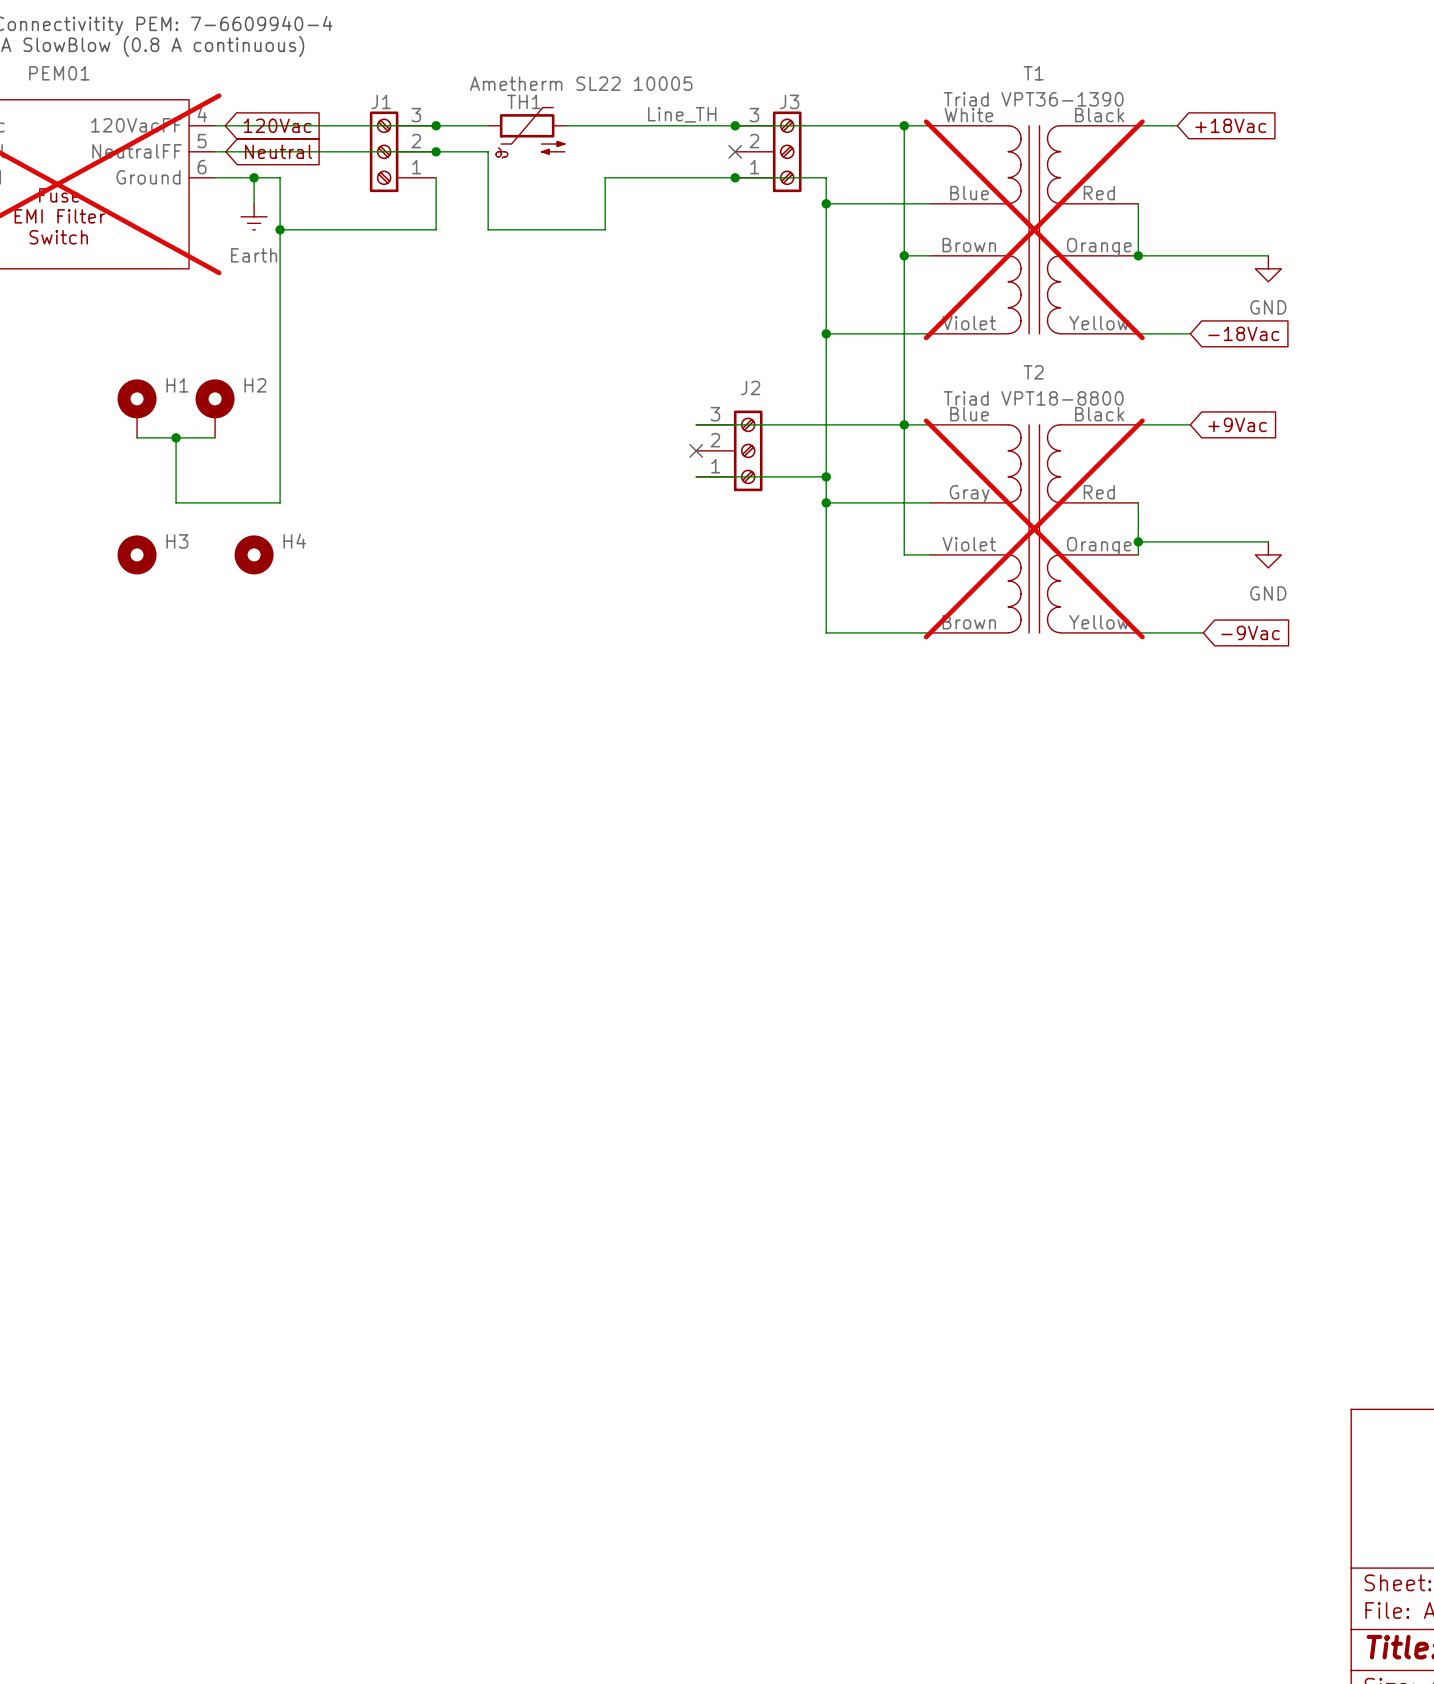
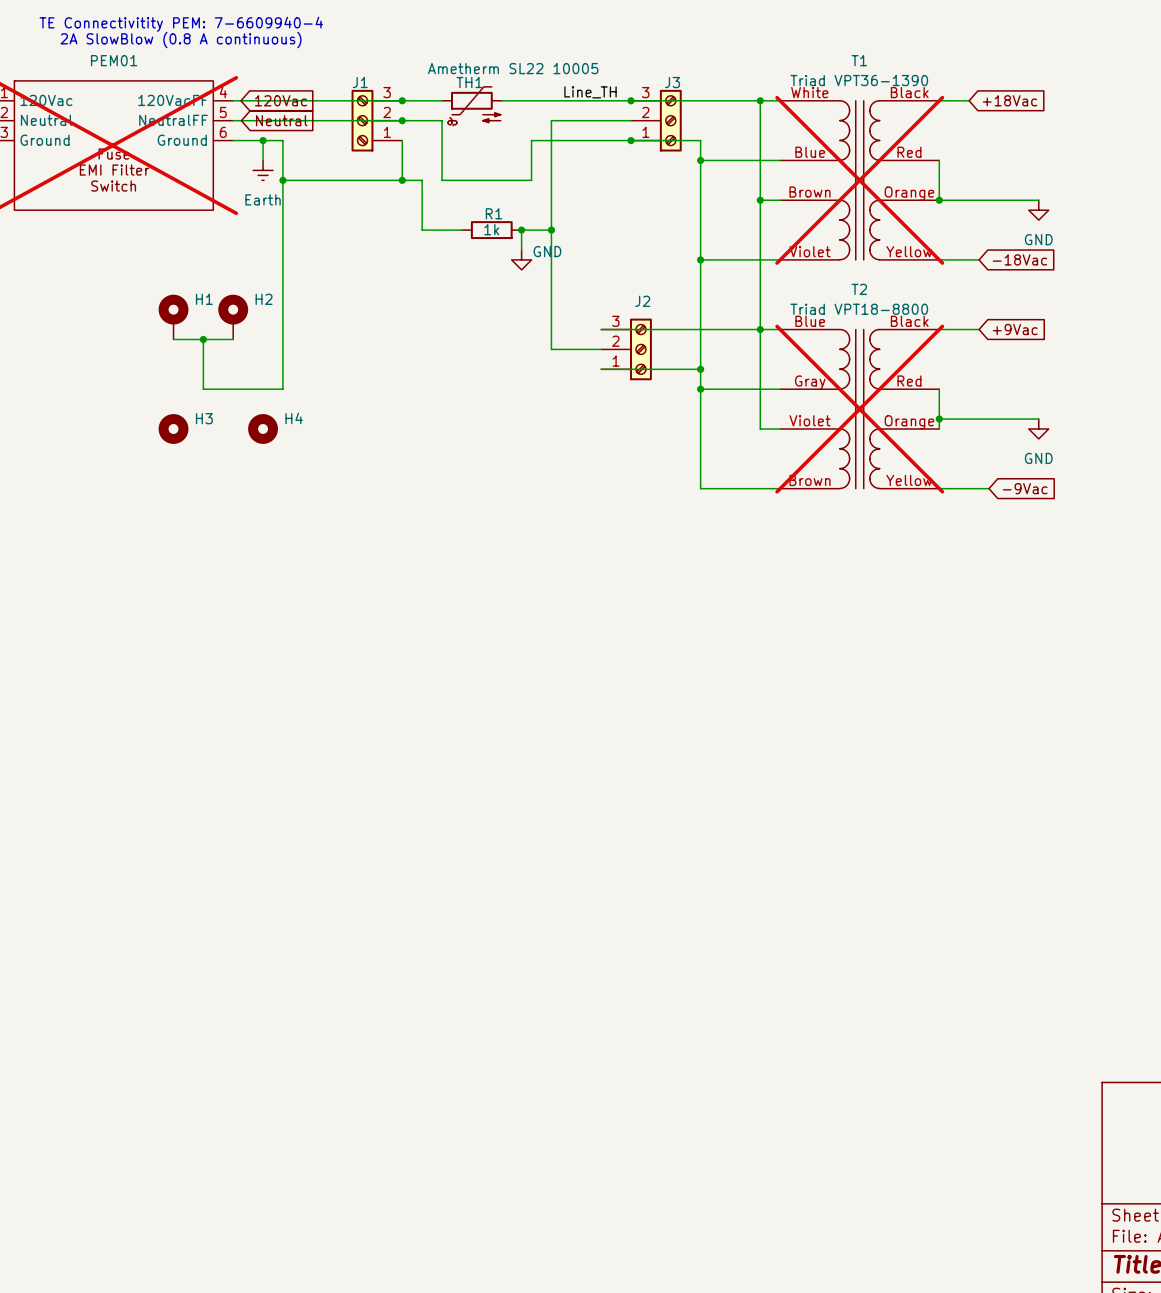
wire: none -> (631, 120) (551, 120) (551, 349) (601, 349)
no-connect mark: (735, 151) -> none
wire: none -> (402, 180) (422, 180) (422, 230) (461, 230)
junction: none -> (402, 180)
R1: none -> 1k (491, 230)
junction: none -> (521, 230)
wire: none -> (551, 230) (521, 230) (521, 249)
junction: none -> (551, 230)
power symbol: none -> GND (521, 259)
no-connect mark: (696, 450) -> none

